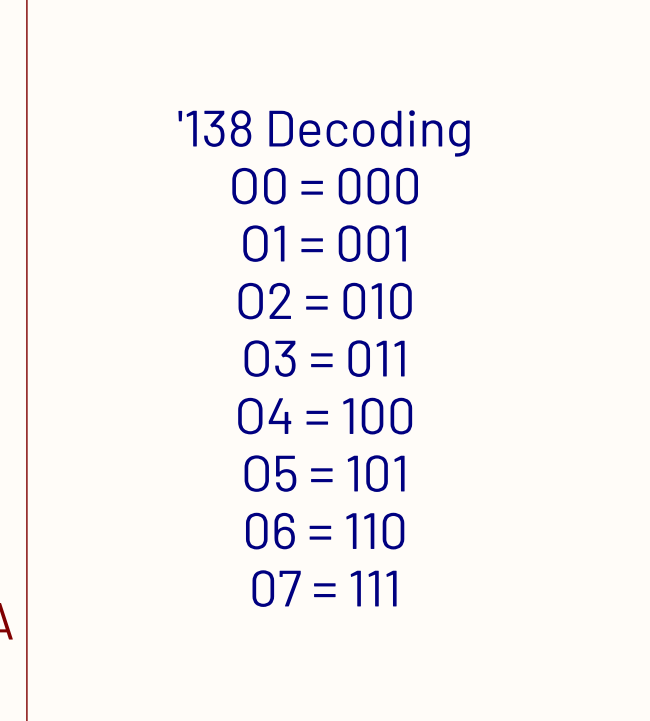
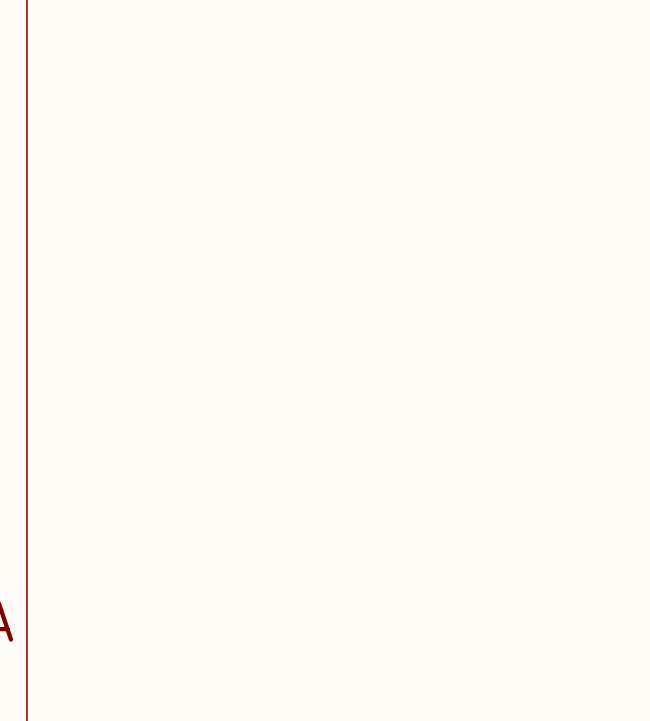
text: '138 Decoding (324, 133) -> none
text: O0 = 000 (325, 186) -> none
text: O1 = 001 (324, 243) -> none
text: O2 = 010 (325, 301) -> none
text: O3 = 011 (324, 358) -> none
text: O4 = 100 (325, 416) -> none
text: O5 = 101 (324, 473) -> none
text: 06 = 110 (325, 531) -> none
text: 07 = 111 (324, 588) -> none

